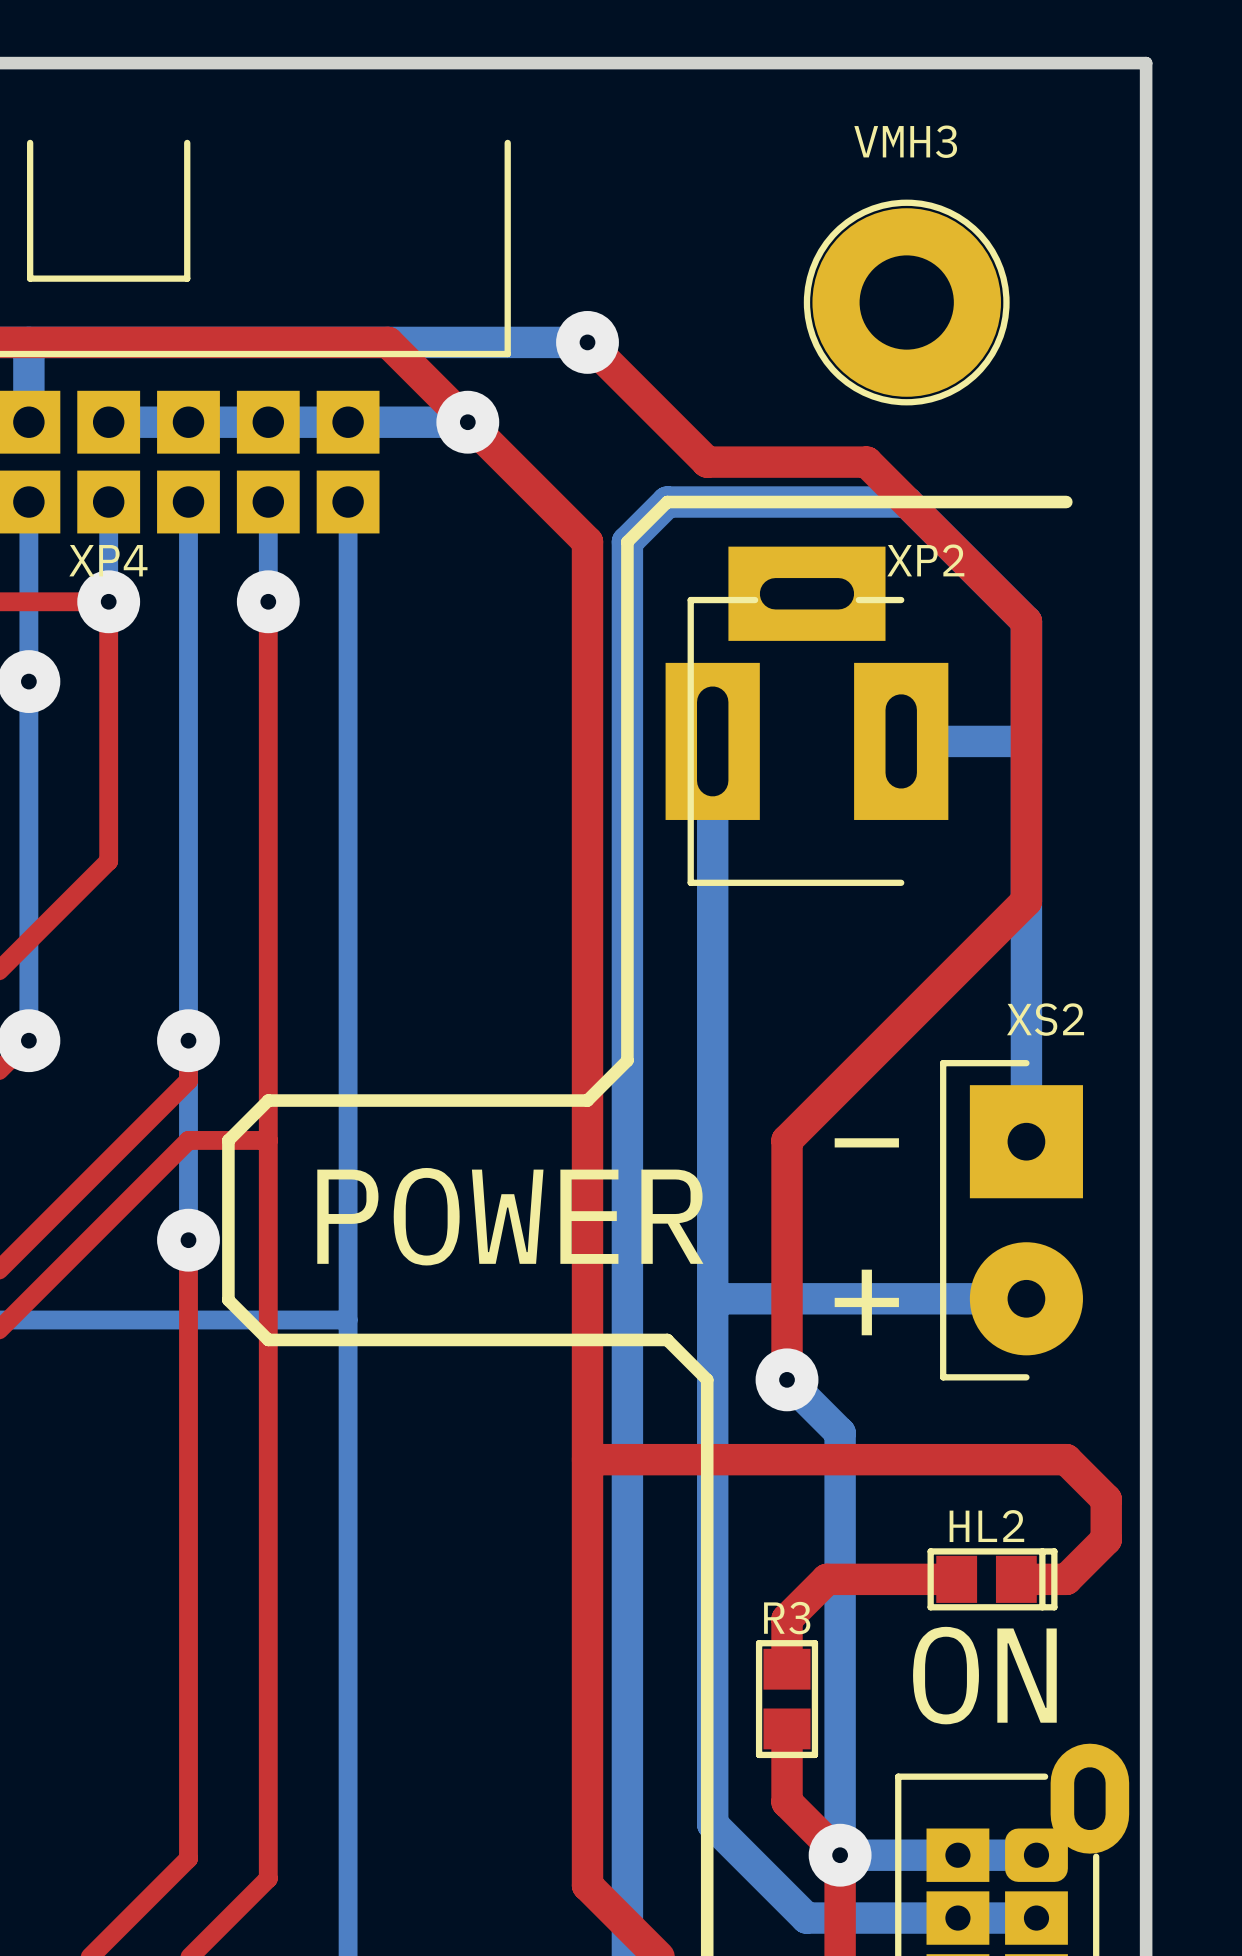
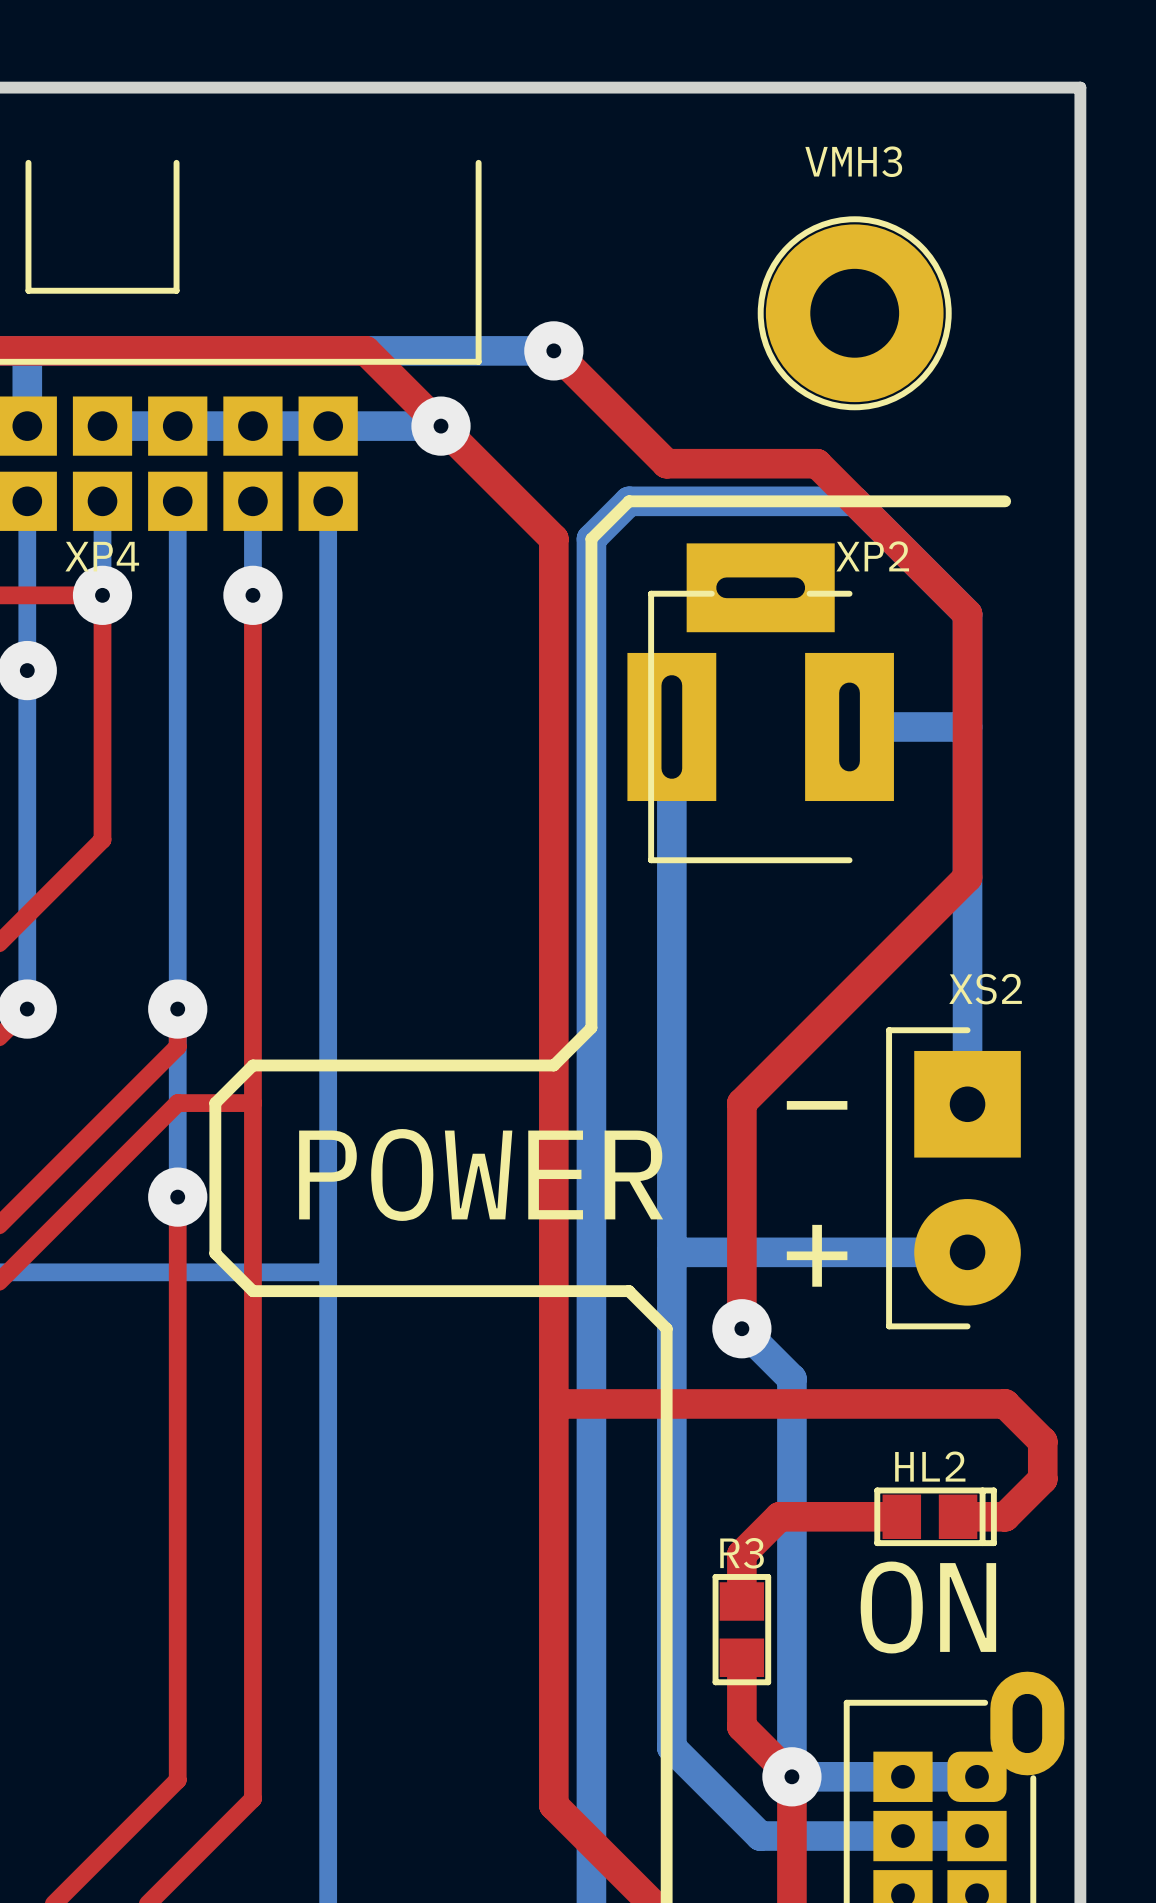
XP2 footprint: [665, 546, 949, 886] -> [627, 543, 894, 864]

